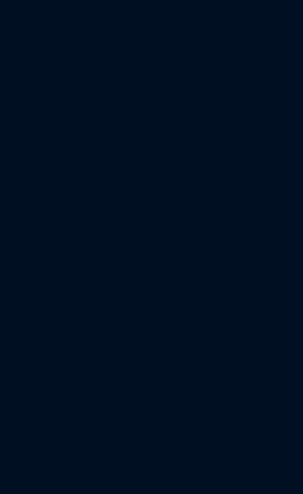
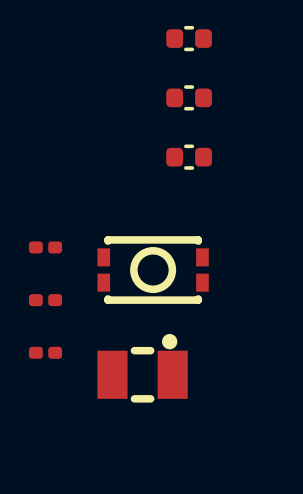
part: none -> (189, 38)
part: none -> (189, 97)
part: none -> (189, 157)
part: none -> (45, 247)
part: none -> (153, 270)
part: none -> (45, 300)
part: none -> (45, 352)
part: none -> (142, 368)

